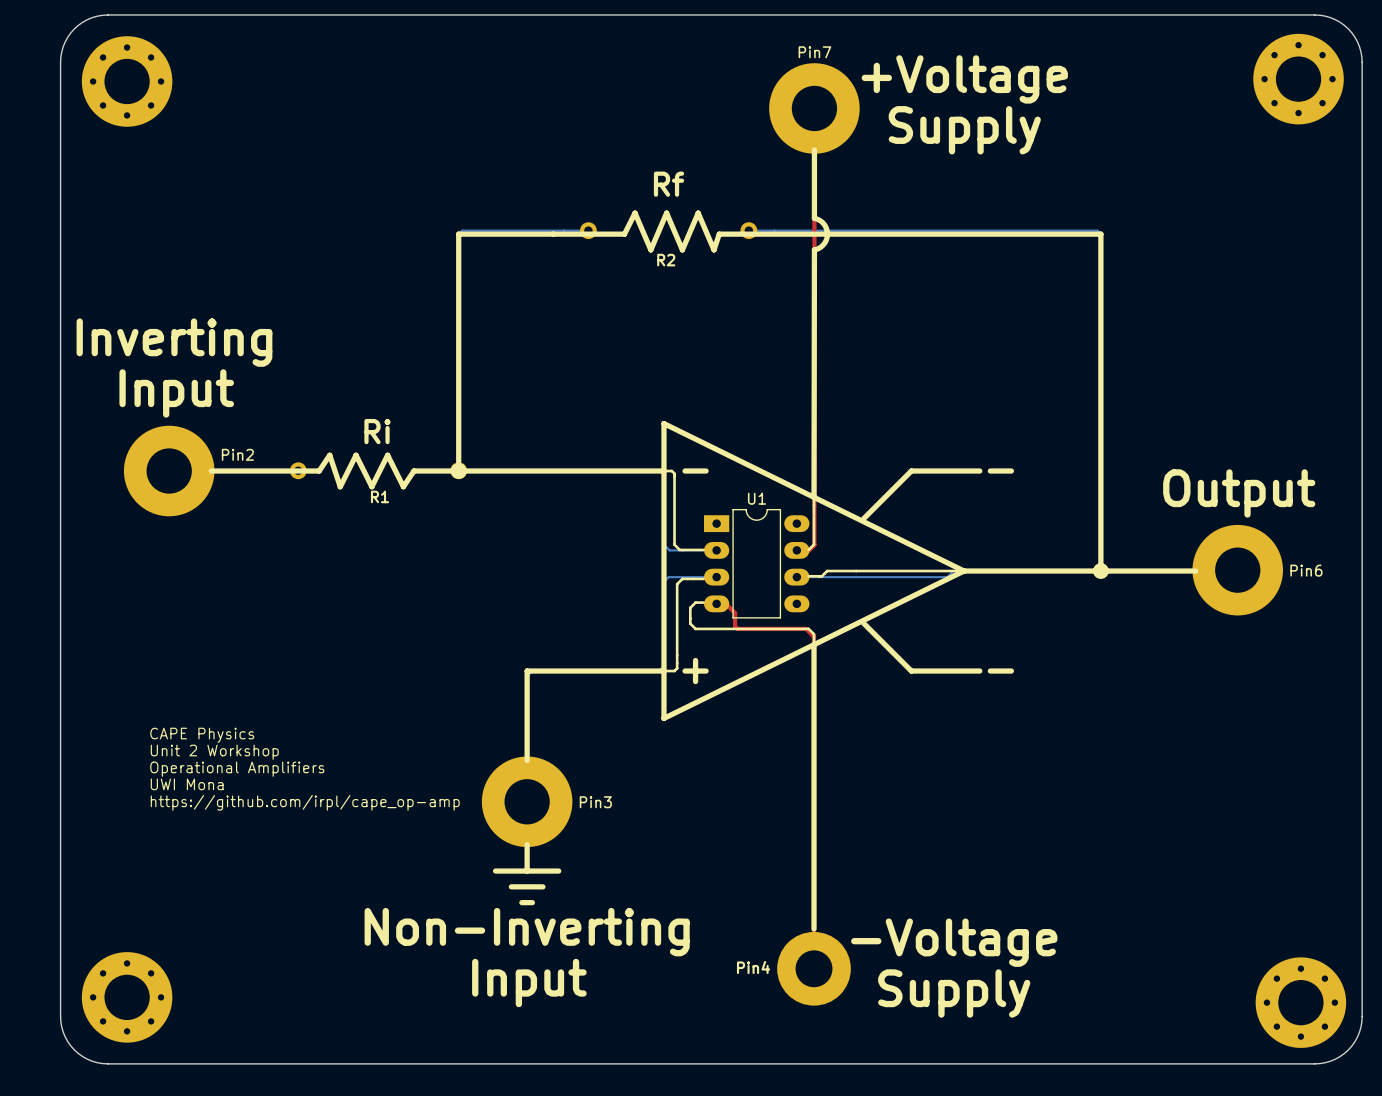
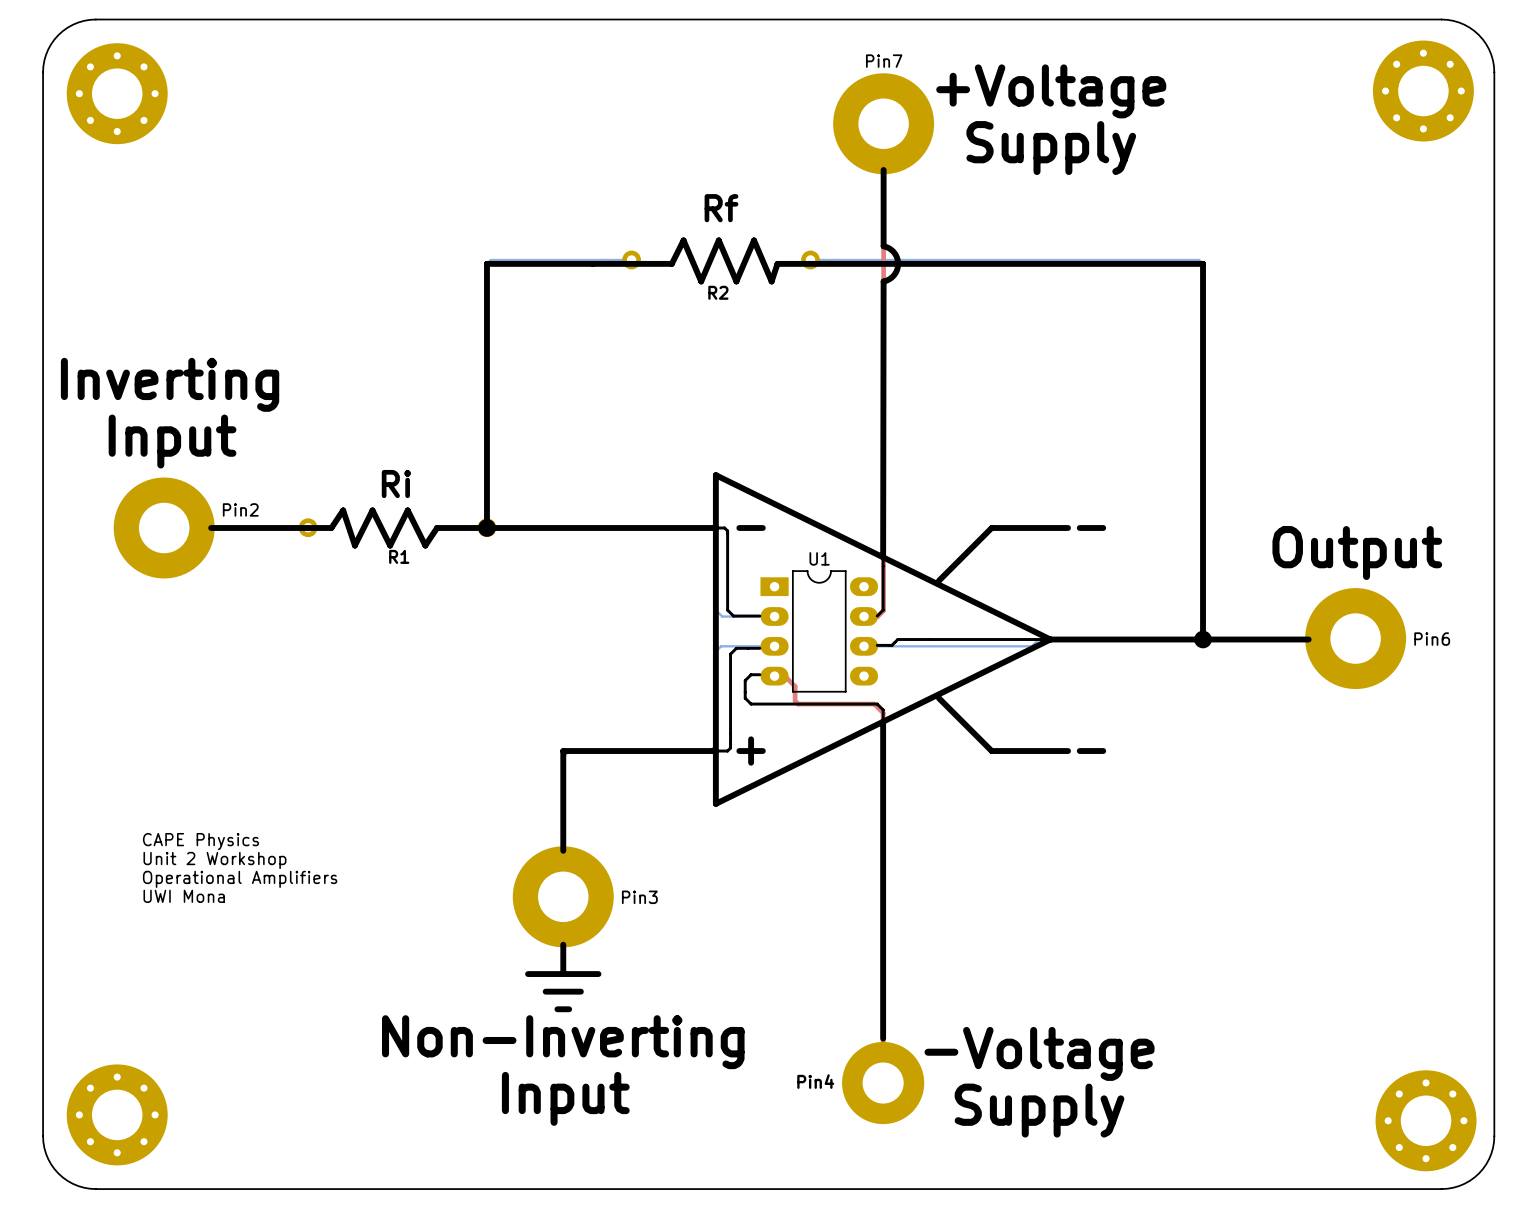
text: CAPE Physics (202, 735) -> none
text: Unit 2 Workshop (214, 752) -> CAPE Physics (200, 841)
text: Operational Amplifiers (237, 769) -> Unit 2 Workshop (214, 860)
text: UWI Mona (187, 784) -> Operational Amplifiers (240, 879)
text: https://github.com/irpl/cape_op-amp (305, 802) -> UWI Mona (184, 896)

